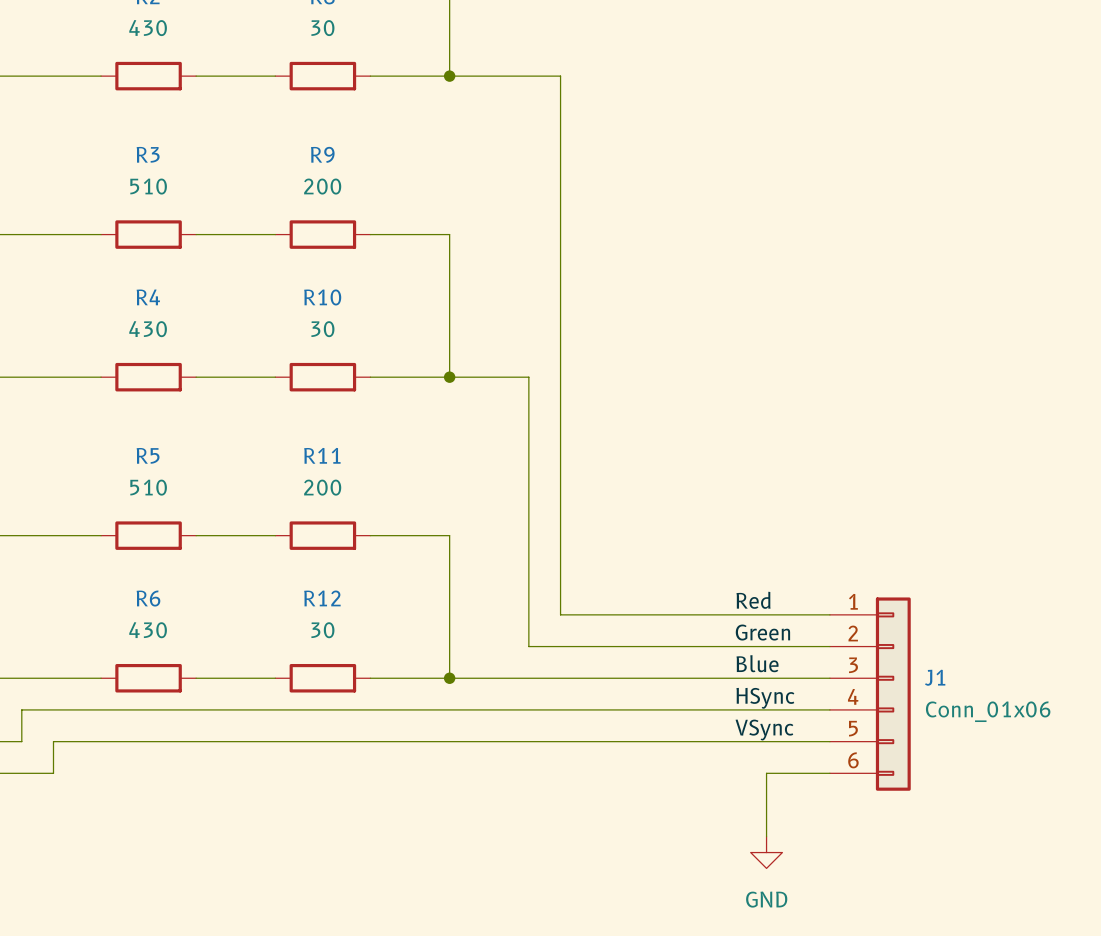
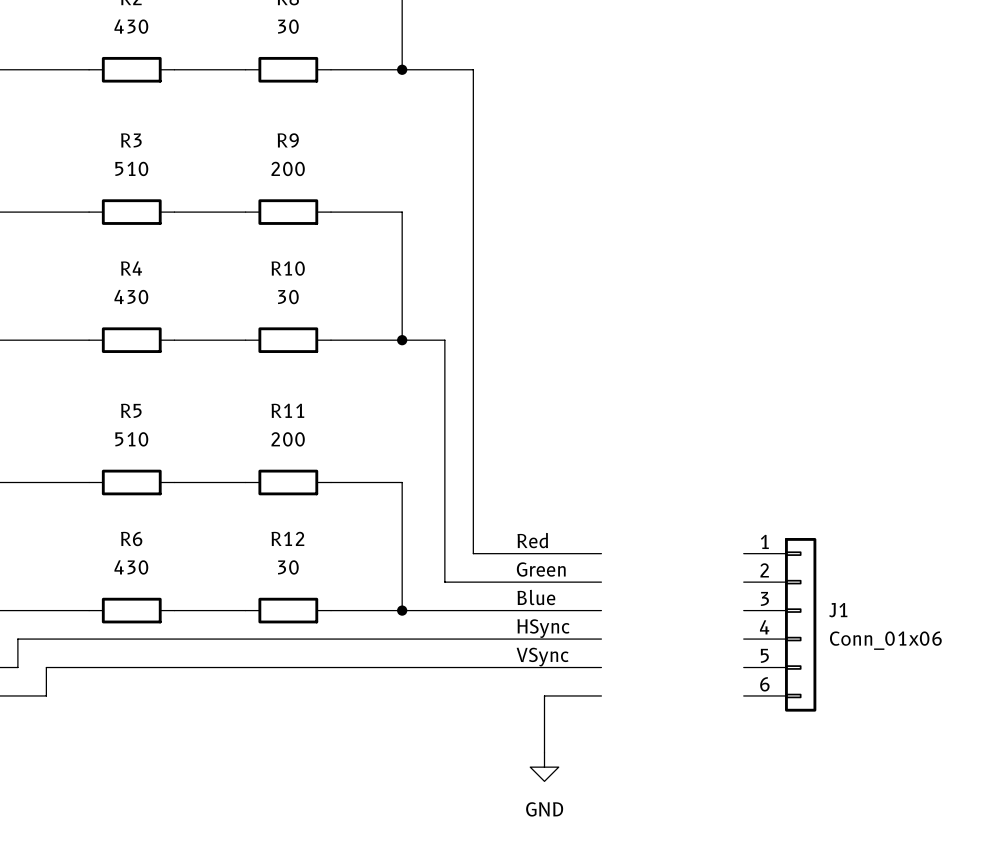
wire: (528, 76) (560, 76) (560, 614) -> (473, 69) (473, 340)
wire: (497, 377) (528, 377) -> (444, 340) (444, 582) (473, 582)
label position: Red (753, 600) -> Red (532, 540)
wire: (528, 614) (528, 646) -> (473, 553) (501, 553)
wire: (671, 614) (829, 614) -> none
label position: Green (762, 632) -> Green (541, 569)
wire: (671, 646) (829, 646) -> none
label position: Blue (757, 663) -> Blue (536, 597)
wire: (671, 678) (829, 678) -> none
label position: HSync (765, 698) -> HSync (543, 628)
wire: (671, 709) (829, 709) -> none
label position: VSync (764, 730) -> VSync (542, 657)
wire: (671, 741) (829, 741) -> none
wire: (829, 773) (766, 773) (766, 836) -> (601, 695) (544, 695) (544, 752)
power symbol position: GND (766, 852) -> GND (544, 767)

